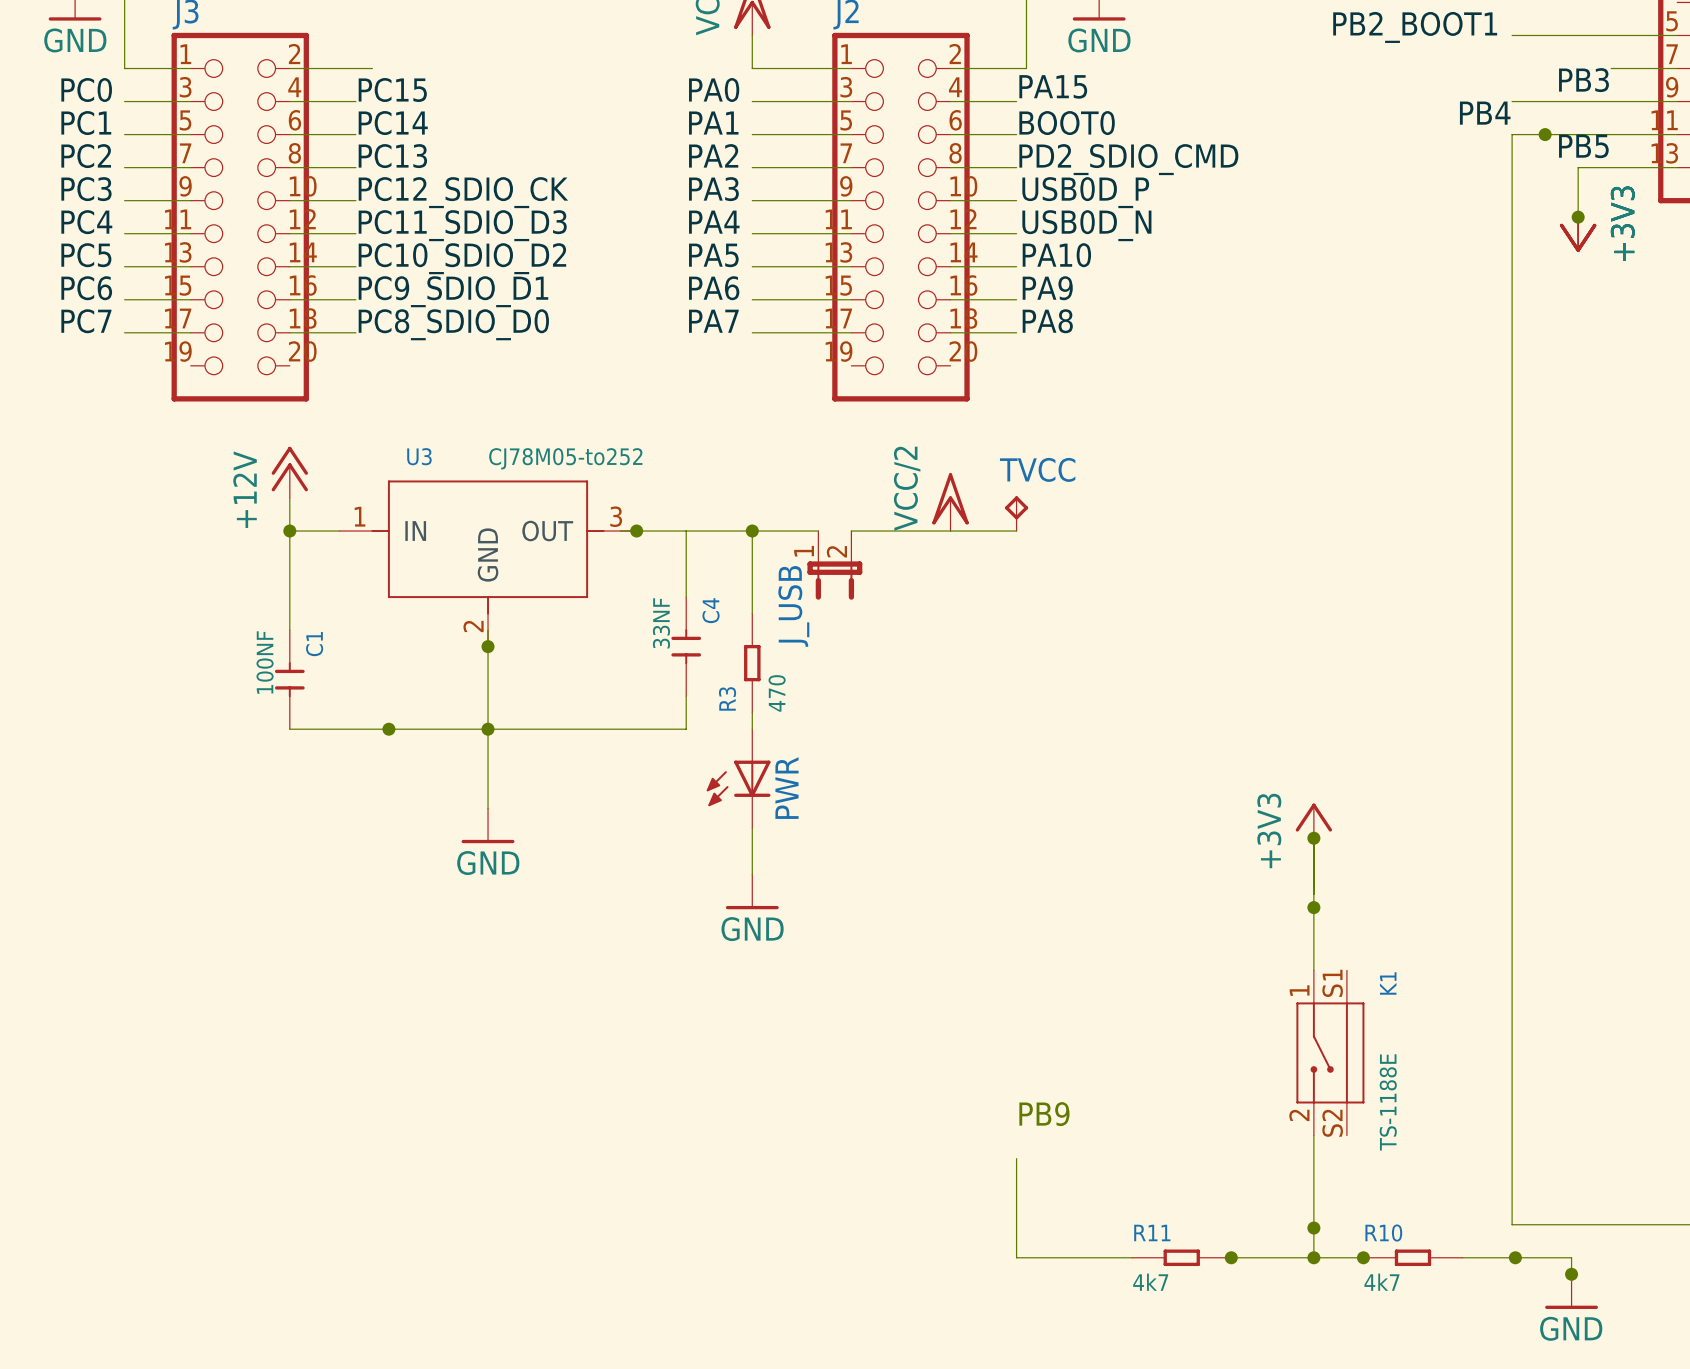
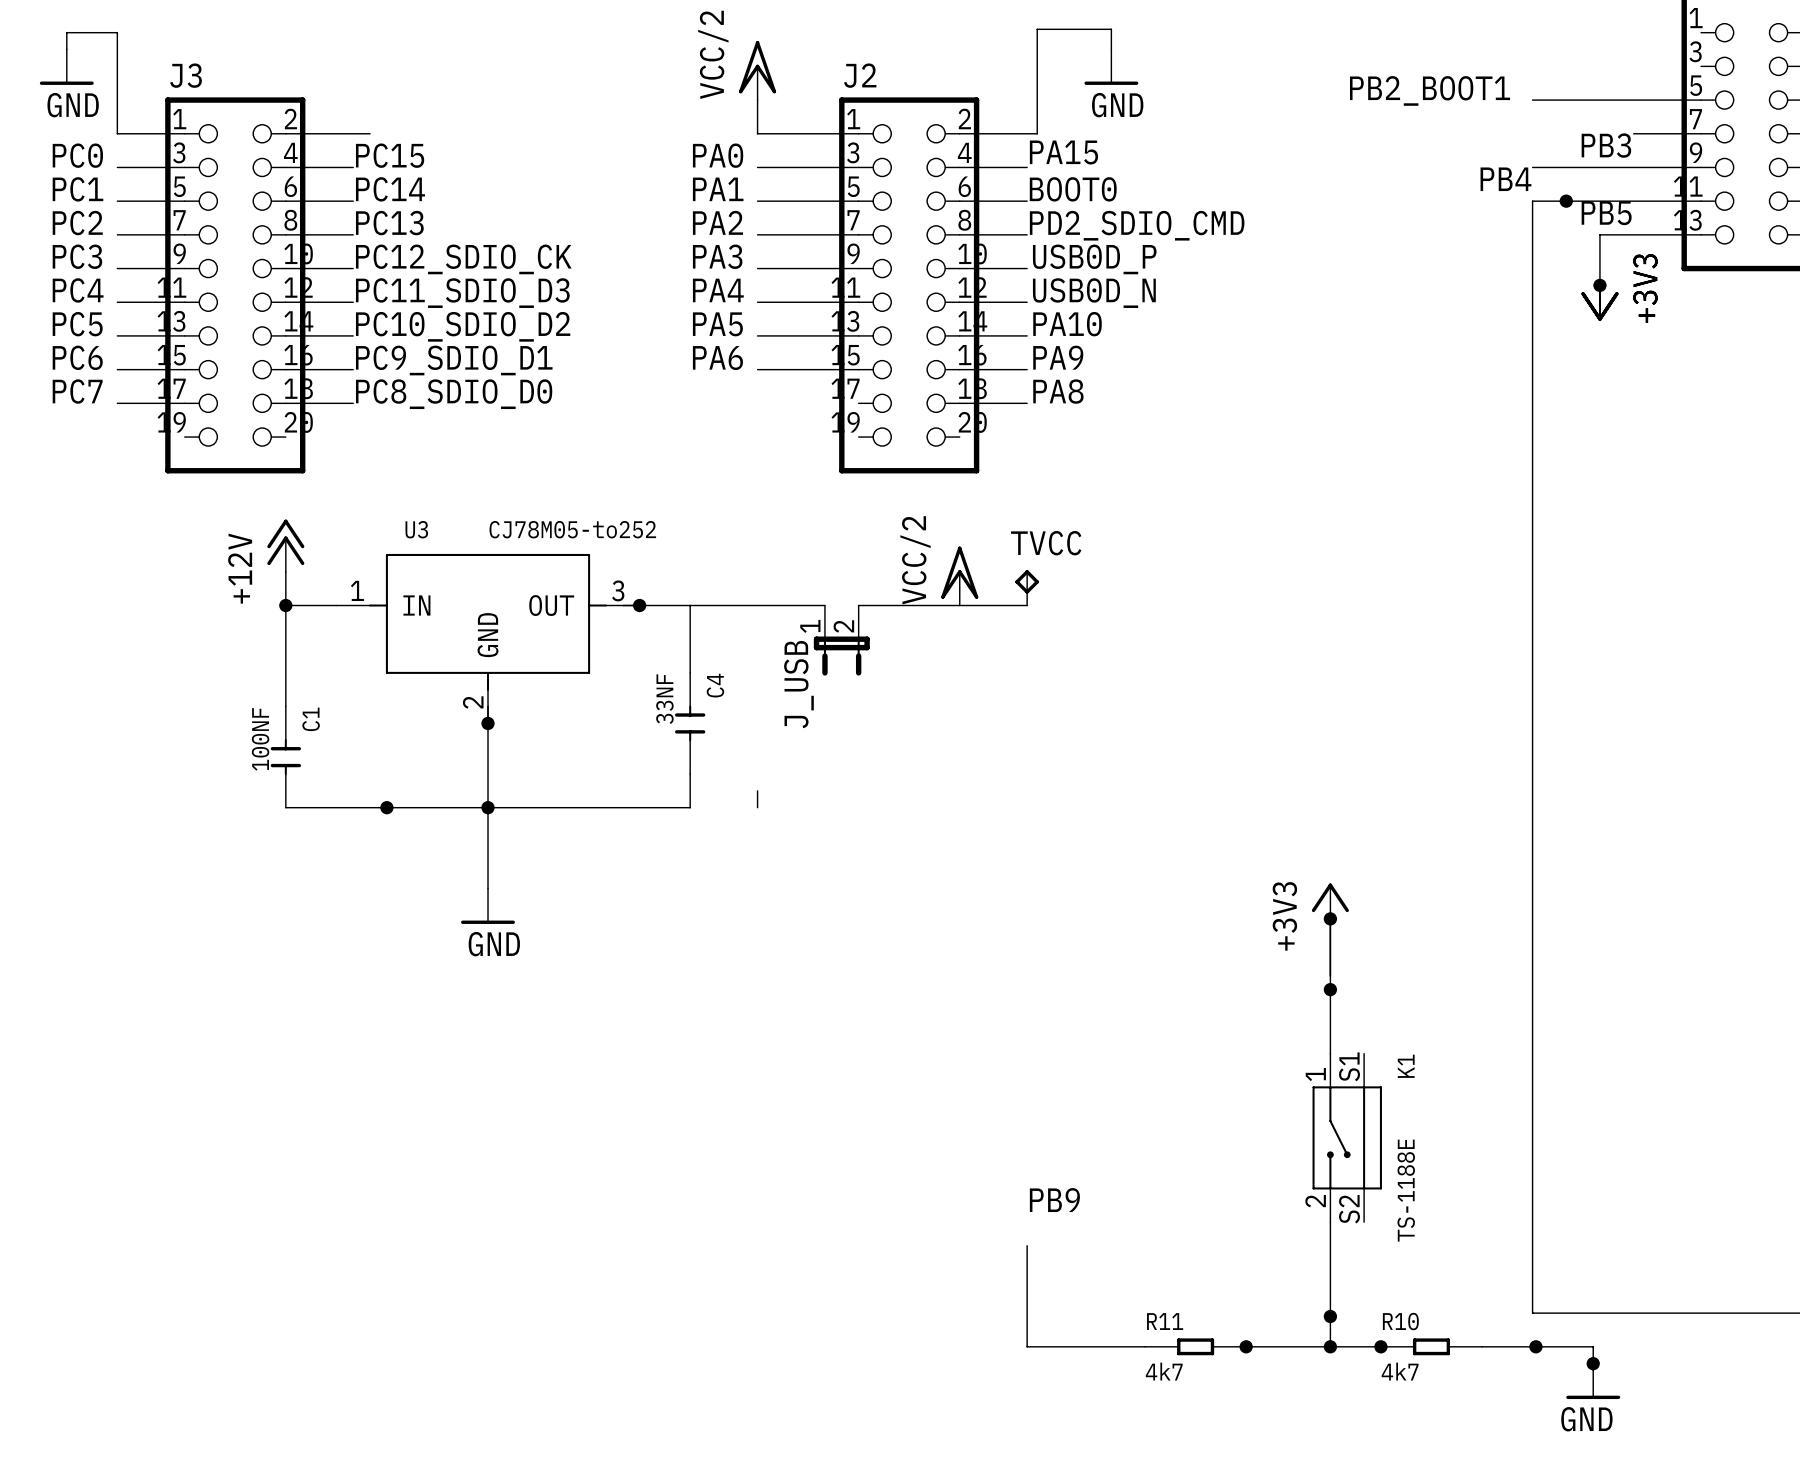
label: PA7 (713, 321) -> none
wire: (752, 332) (851, 332) -> none
wire: (752, 531) (752, 613) -> none
junction: (752, 531) -> none
R3: 470 (752, 663) -> none
PWR: (738, 778) -> none
wire: (752, 828) (752, 874) -> none
power symbol: GND (752, 891) -> none

